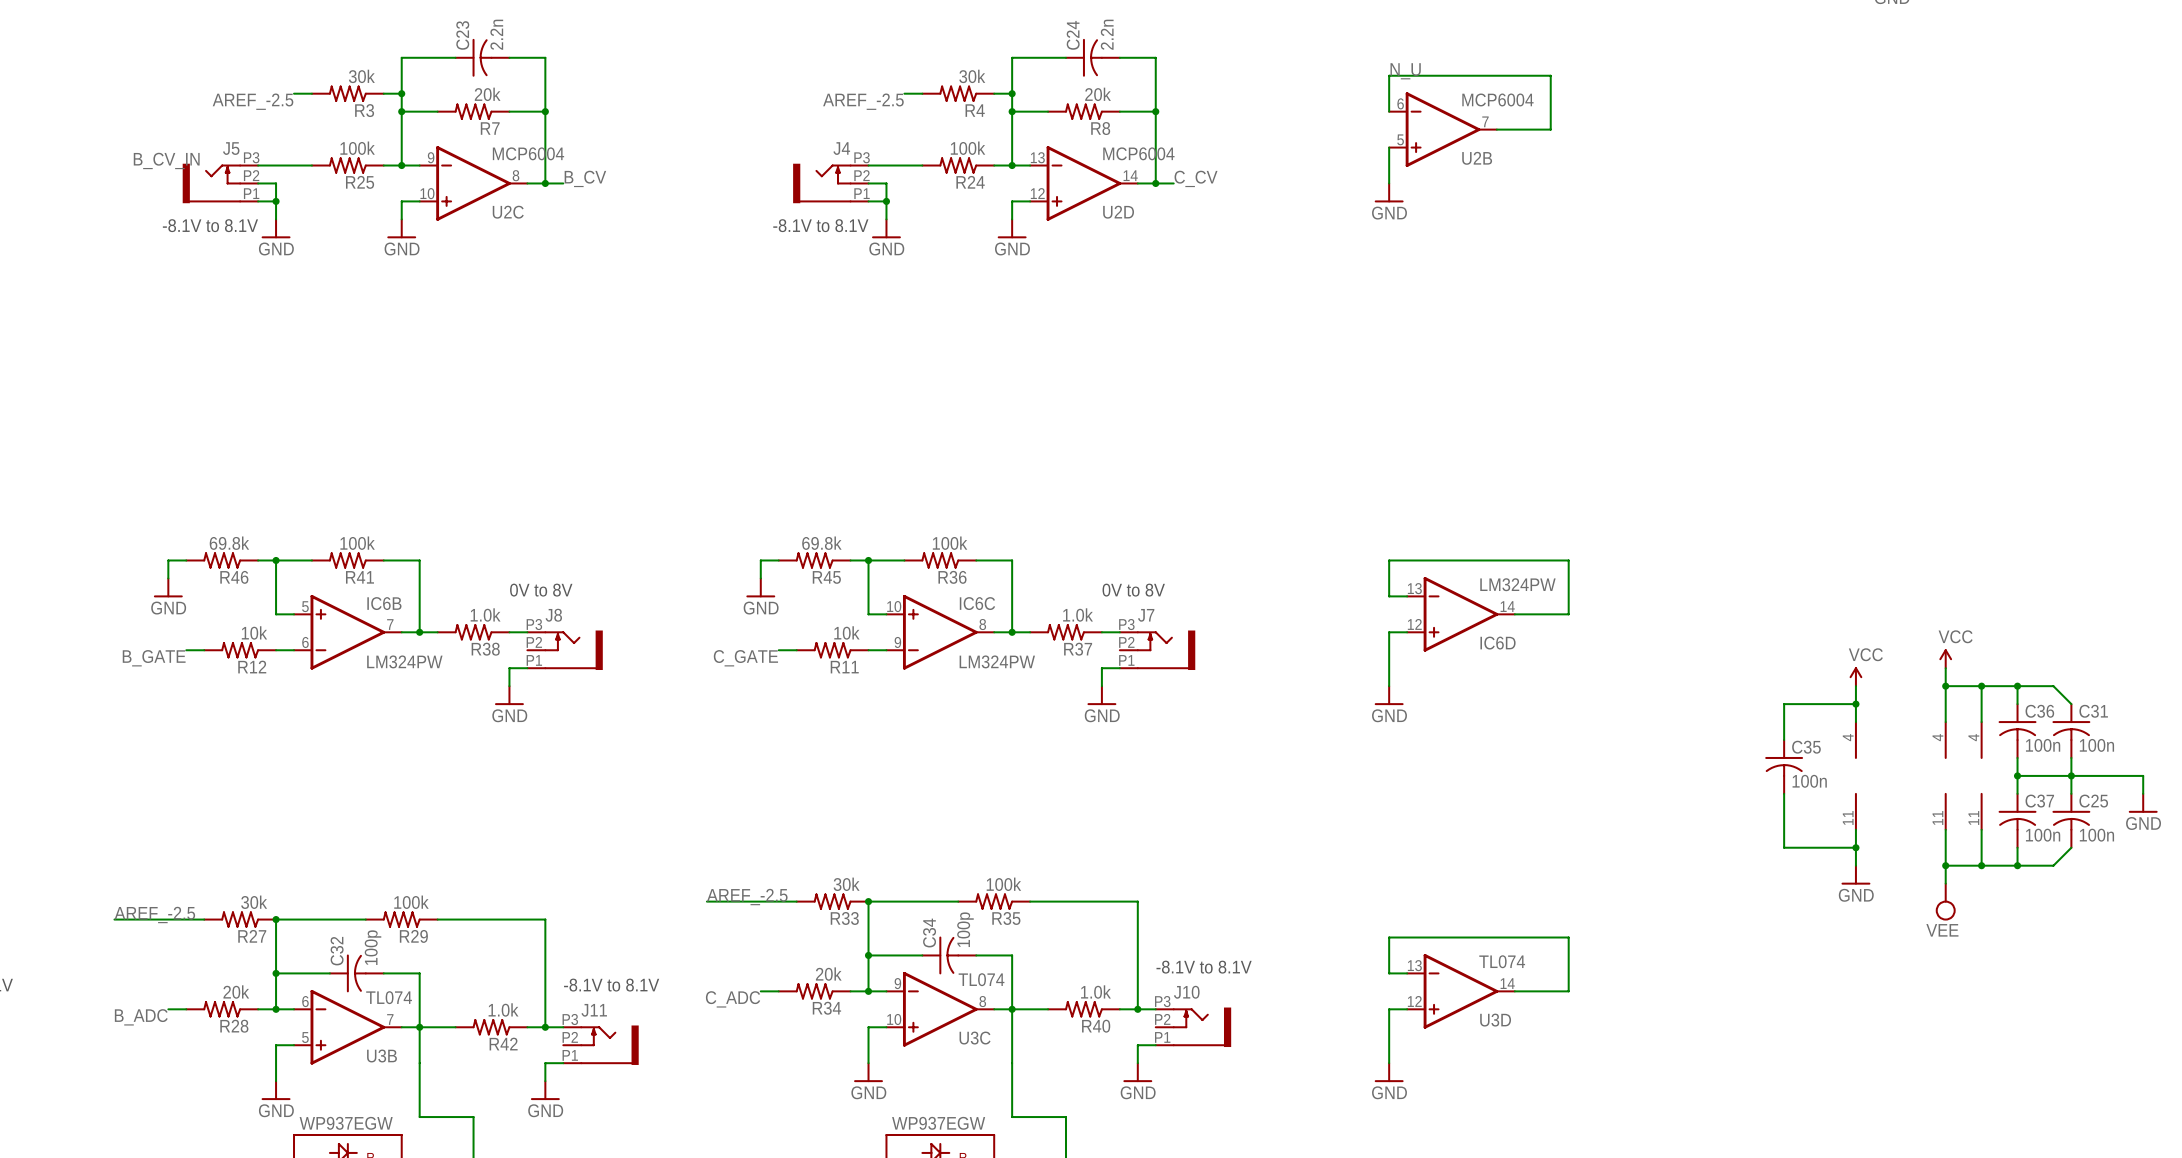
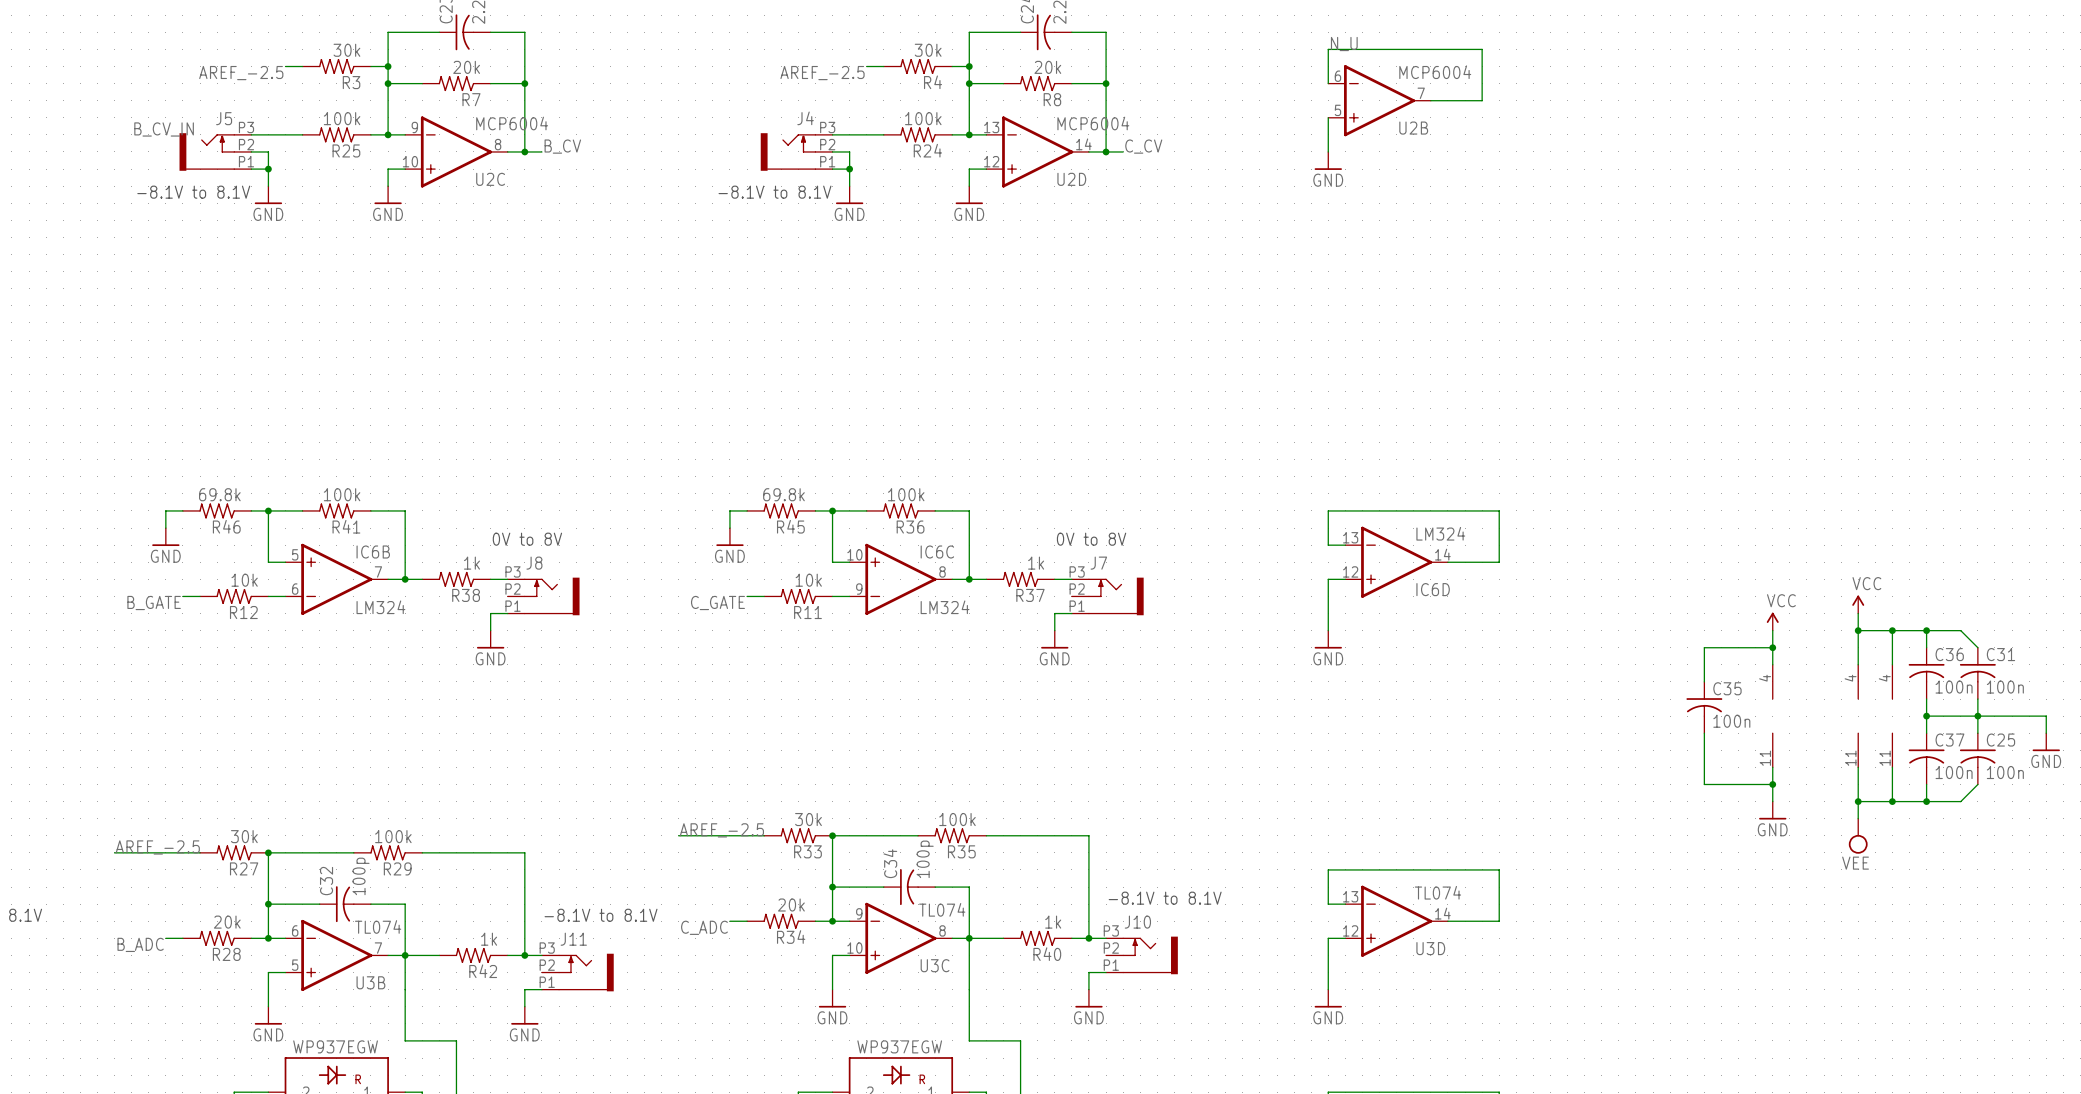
IC6D value: LM324PW (1517, 584) -> LM324 (1440, 533)
R38 value: 1.0k (485, 615) -> 1k (471, 563)
R37 value: 1.0k (1078, 615) -> 1k (1036, 563)
IC6B value: LM324PW (404, 661) -> LM324 (380, 607)
IC6C value: LM324PW (997, 661) -> LM324 (945, 607)
R40 value: 1.0k (1095, 992) -> 1k (1053, 922)
R42 value: 1.0k (503, 1009) -> 1k (489, 939)

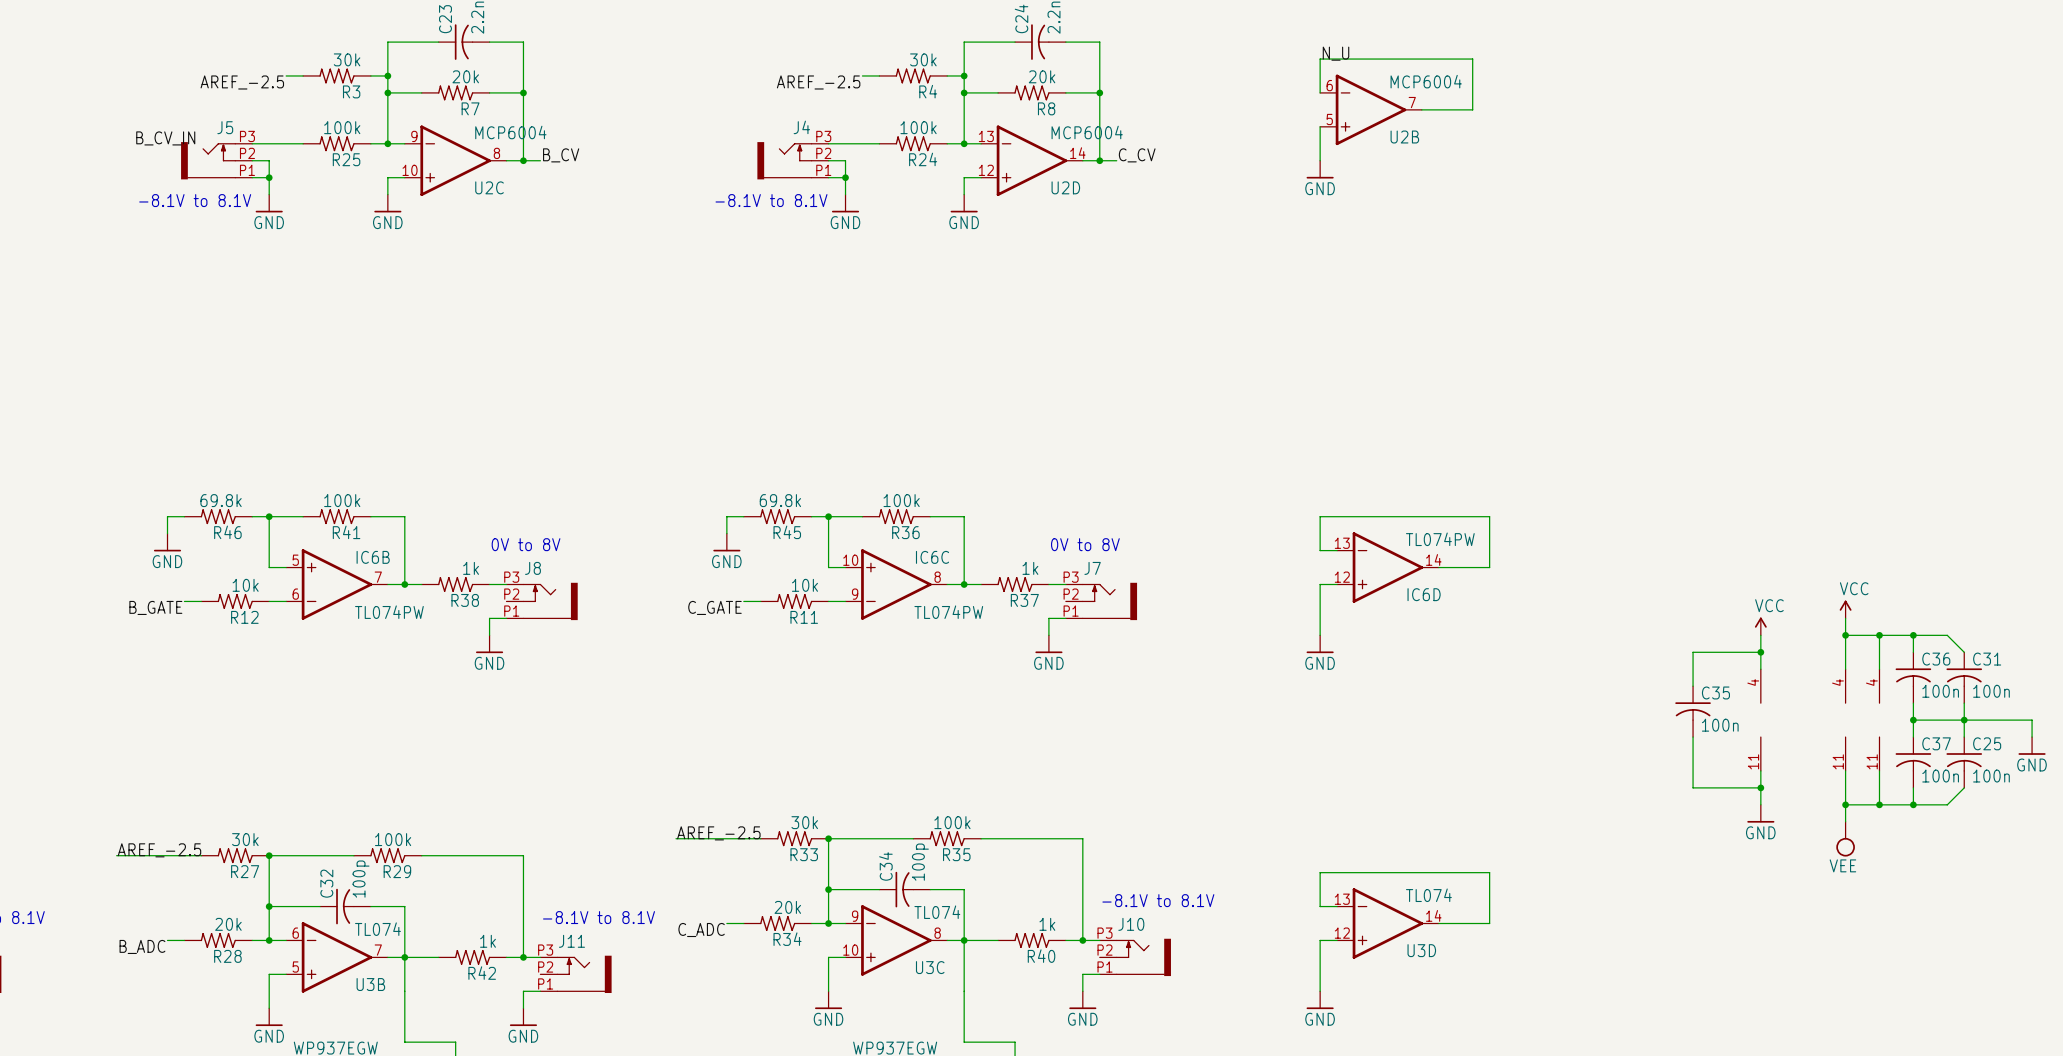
IC6D value: LM324 (1440, 533) -> TL074PW (1440, 539)
IC6B value: LM324 (380, 607) -> TL074PW (389, 612)
IC6C value: LM324 (945, 607) -> TL074PW (948, 612)

